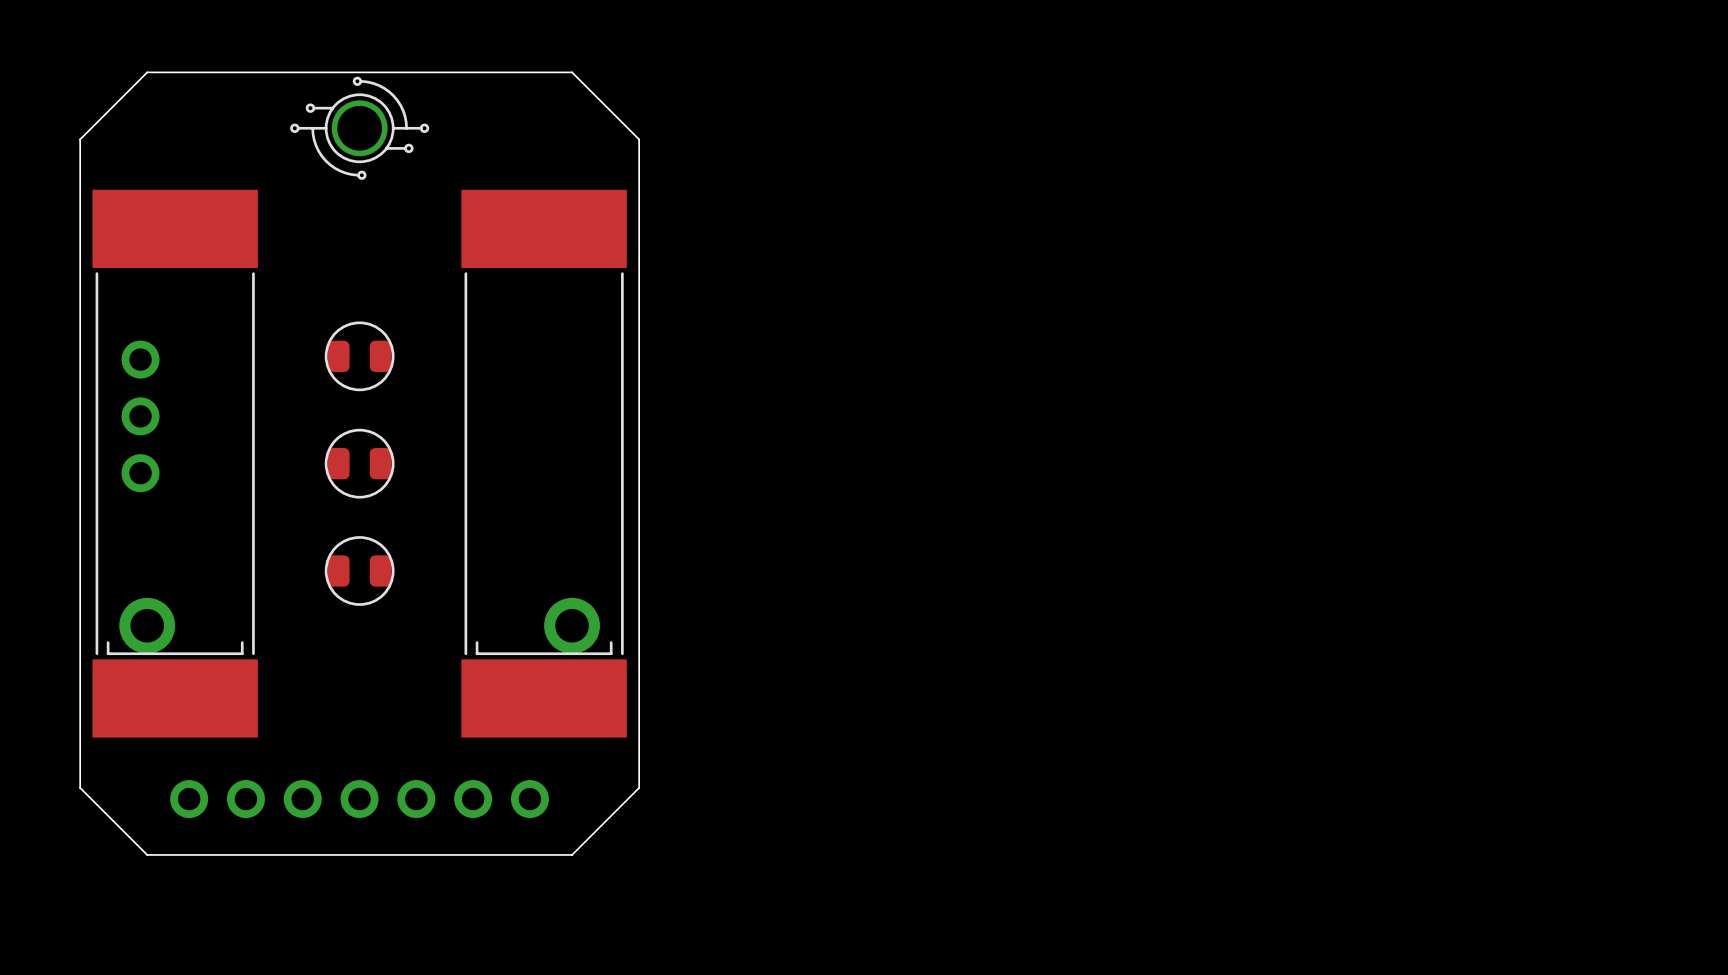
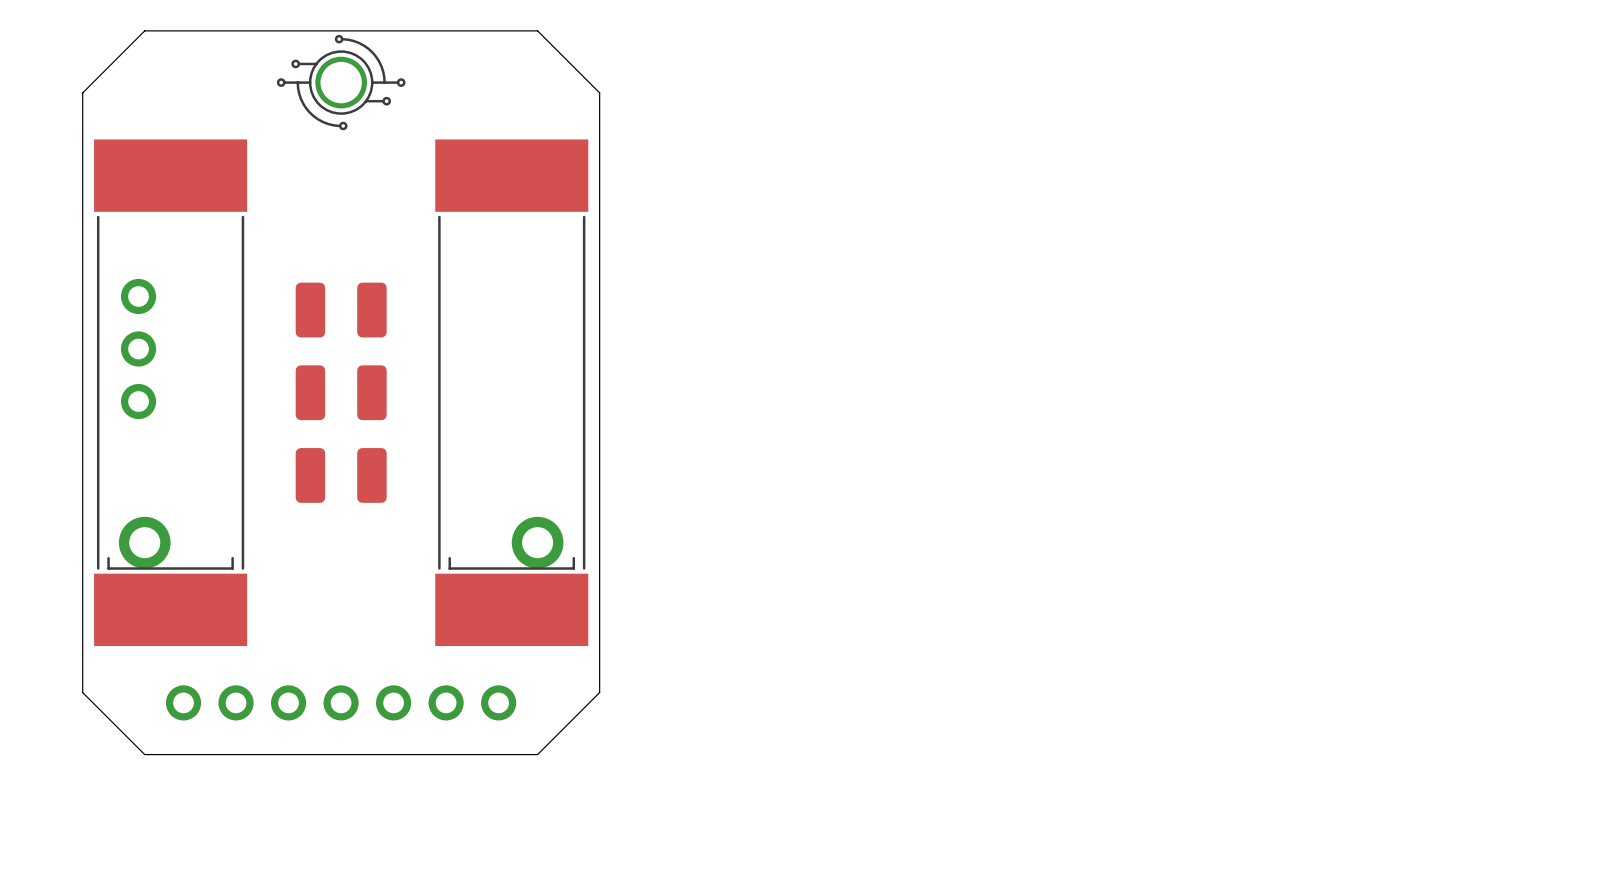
drawing: [324, 321, 395, 392] -> none
part footprint: [327, 340, 392, 373] -> [295, 282, 387, 338]
drawing: [324, 428, 395, 499] -> none
part footprint: [327, 448, 392, 480] -> [295, 365, 387, 421]
drawing: [324, 536, 395, 606] -> none
part footprint: [327, 555, 392, 587] -> [295, 448, 387, 503]

